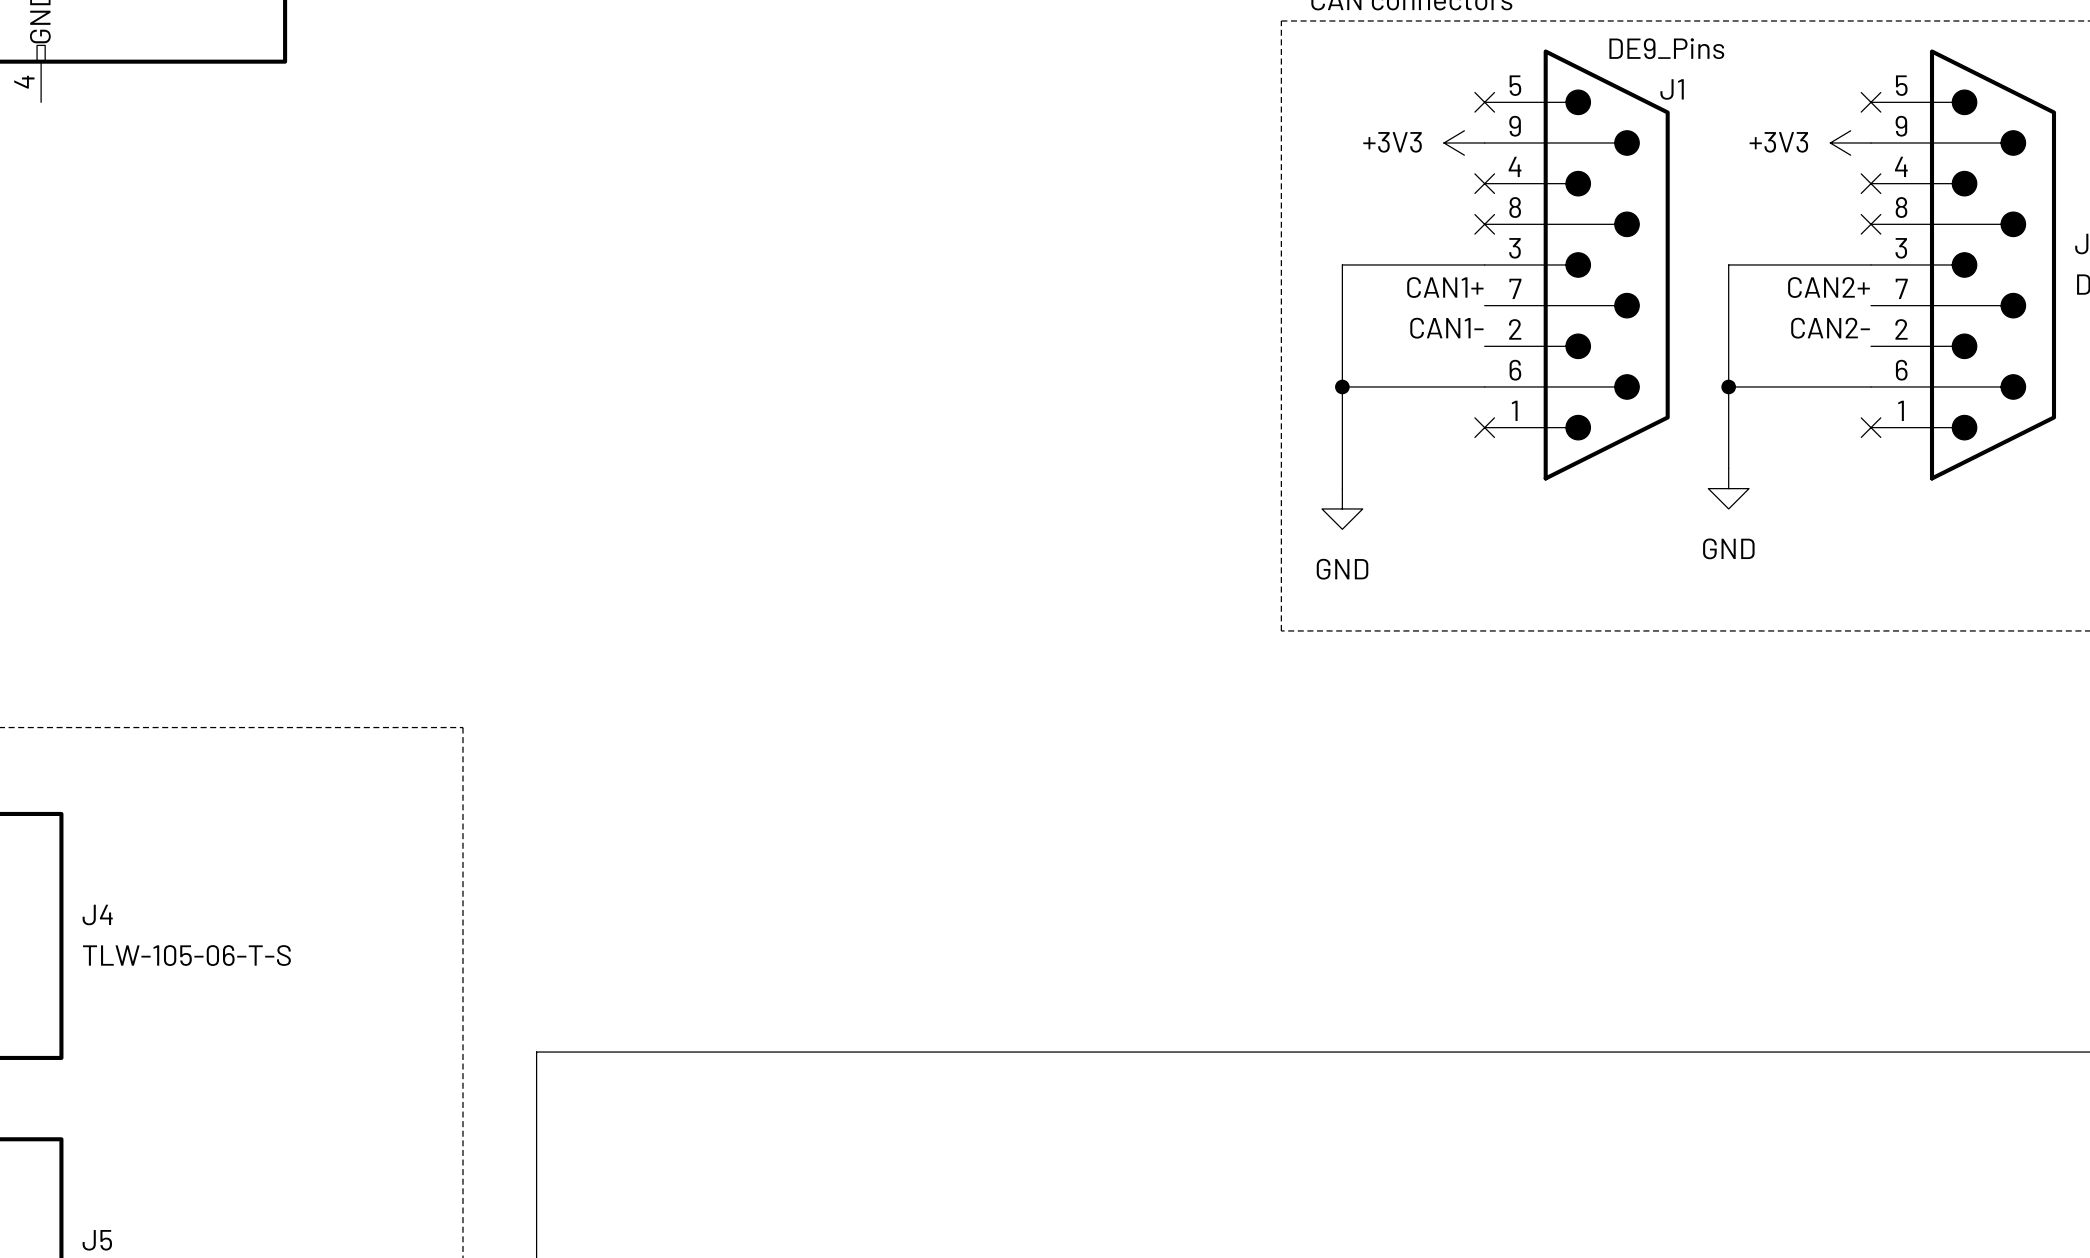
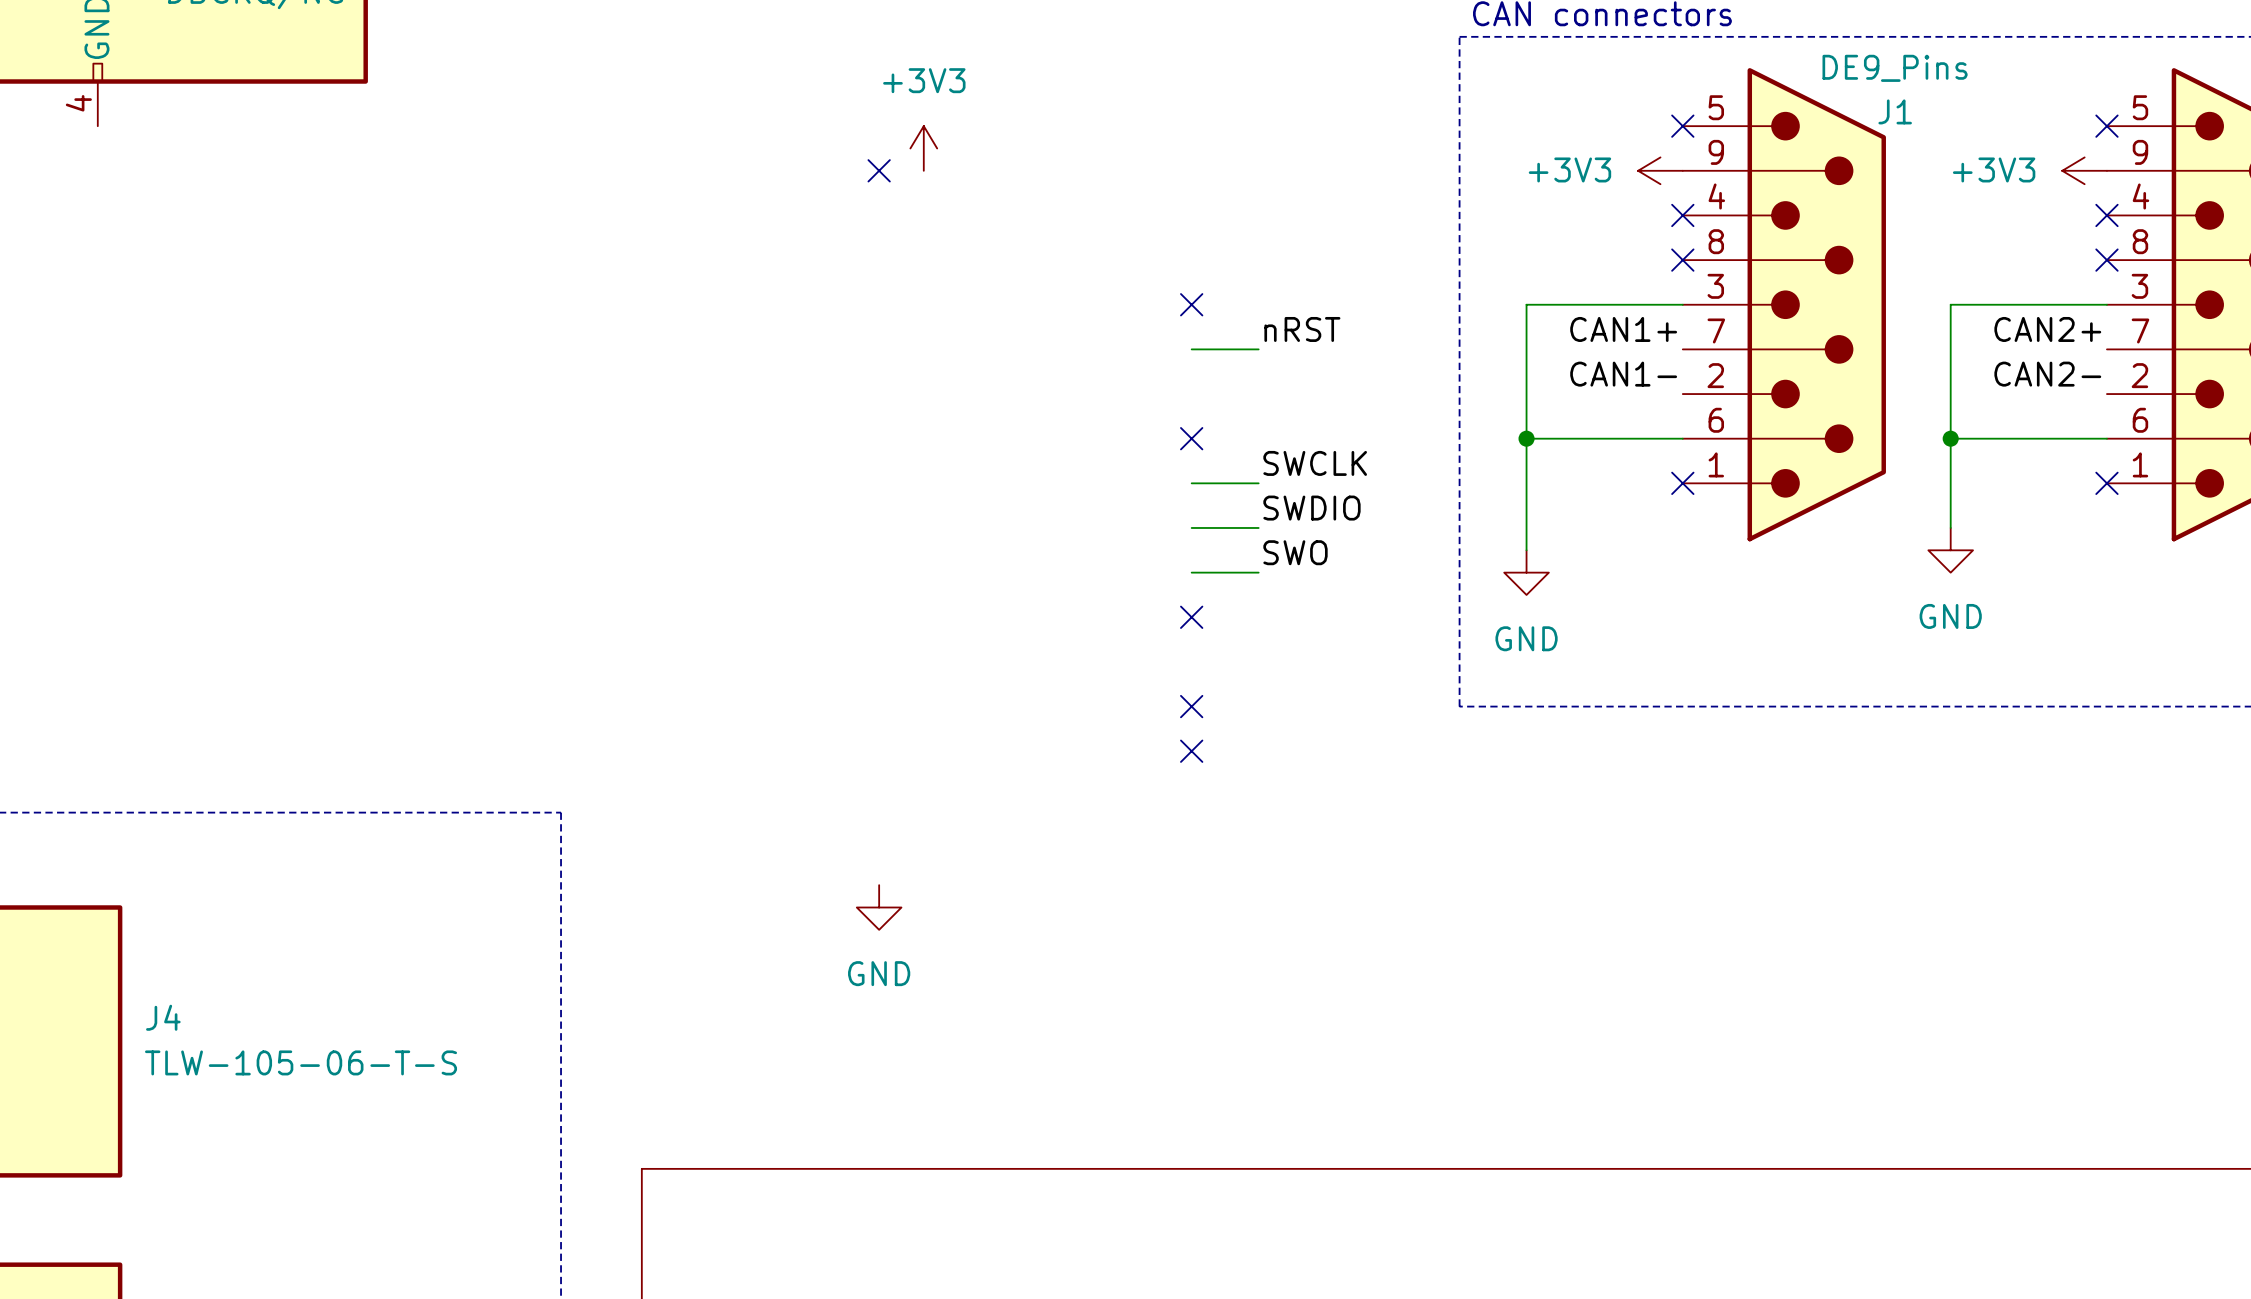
power symbol: none -> +3V3 (923, 148)
no-connect mark: none -> (879, 170)
no-connect mark: none -> (1191, 304)
label: none -> nRST (1302, 329)
wire: none -> (1191, 349) (1258, 349)
no-connect mark: none -> (1191, 438)
label: none -> SWCLK (1315, 463)
wire: none -> (1191, 483) (1258, 483)
label: none -> SWDIO (1311, 508)
wire: none -> (1191, 527) (1258, 527)
label: none -> SWO (1295, 552)
wire: none -> (1191, 572) (1258, 572)
no-connect mark: none -> (1191, 617)
no-connect mark: none -> (1191, 706)
no-connect mark: none -> (1191, 751)
power symbol: none -> GND (879, 907)

